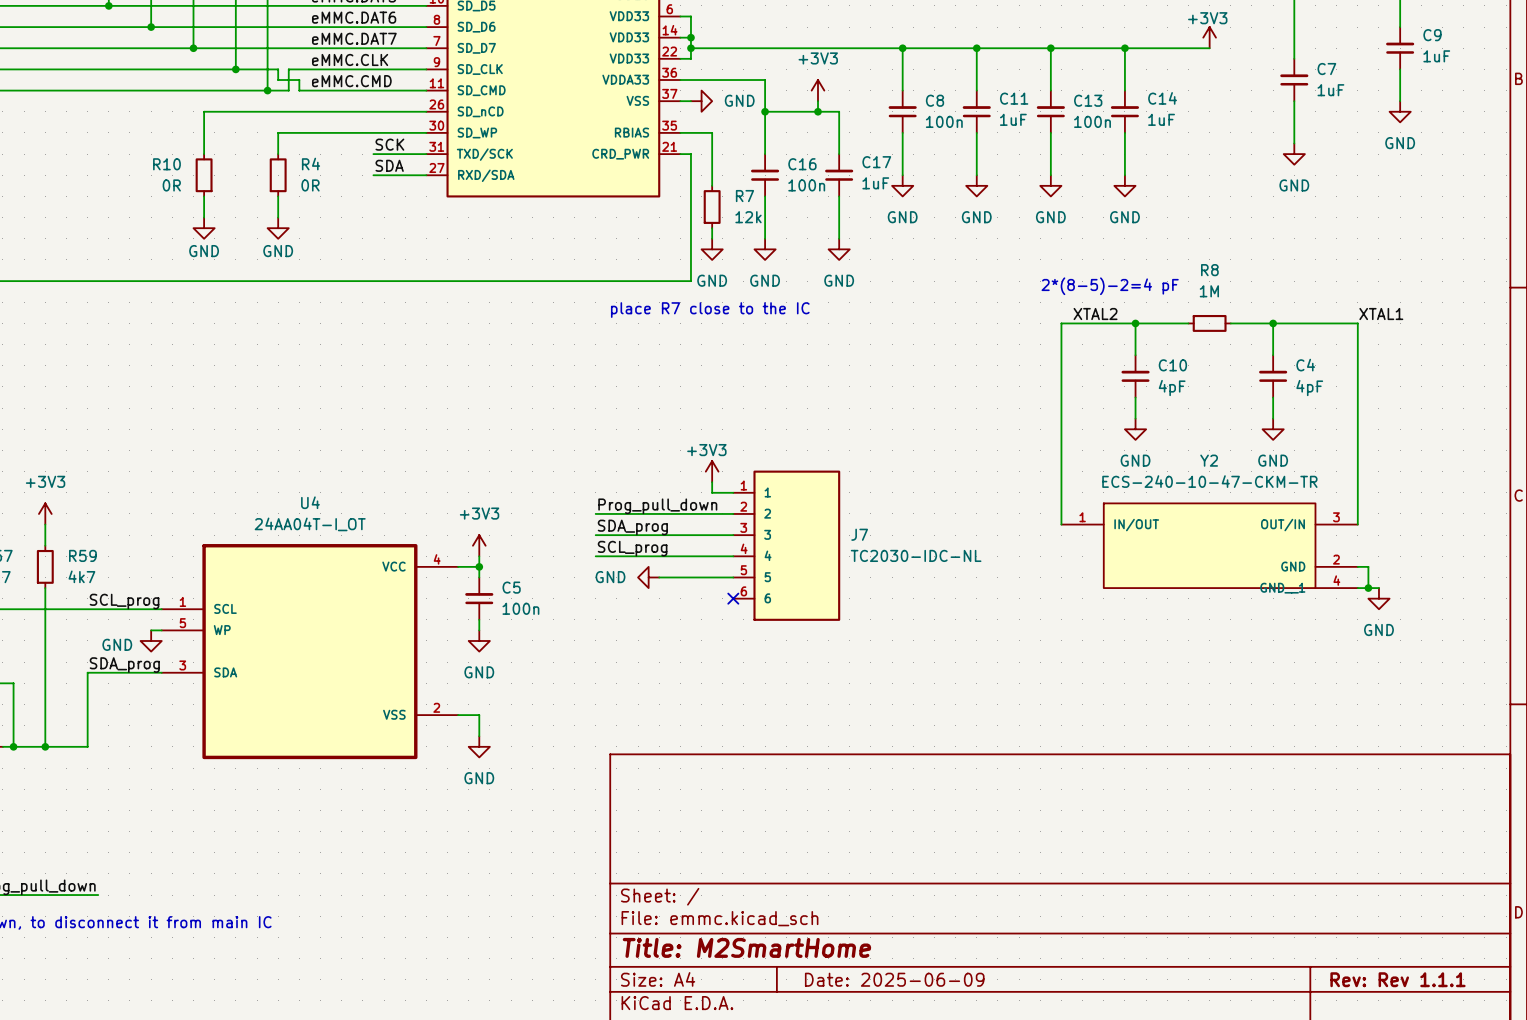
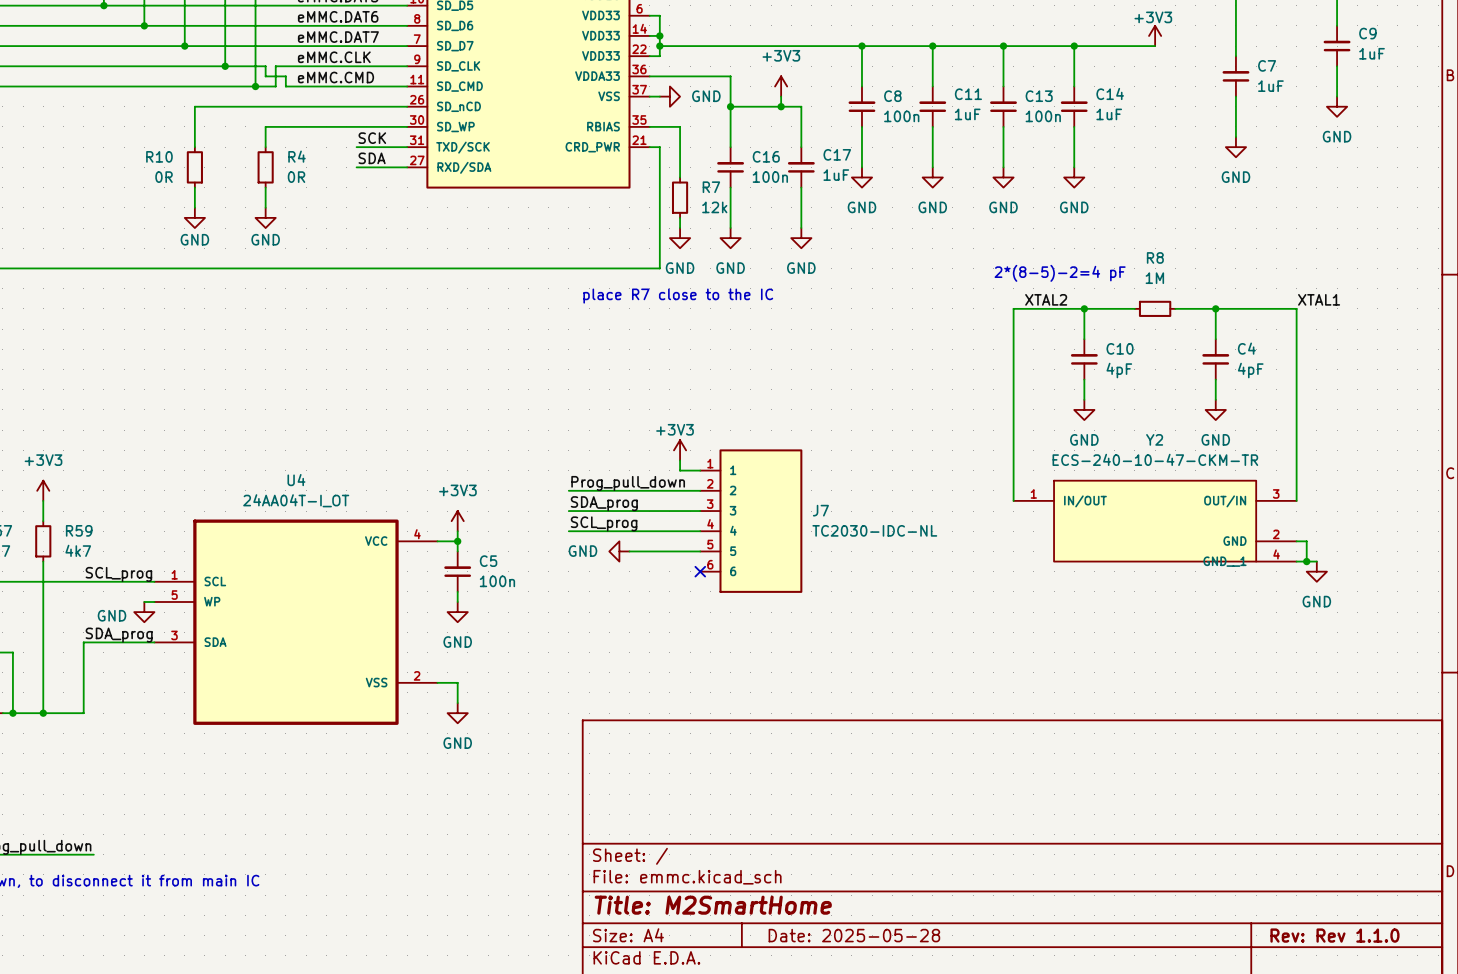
title block: Date: 2025-06-09 (894, 979) -> Date: 2025-05-28 (854, 935)
title block: Rev: Rev 1.1.1 (1397, 979) -> Rev: Rev 1.1.0 (1334, 935)

